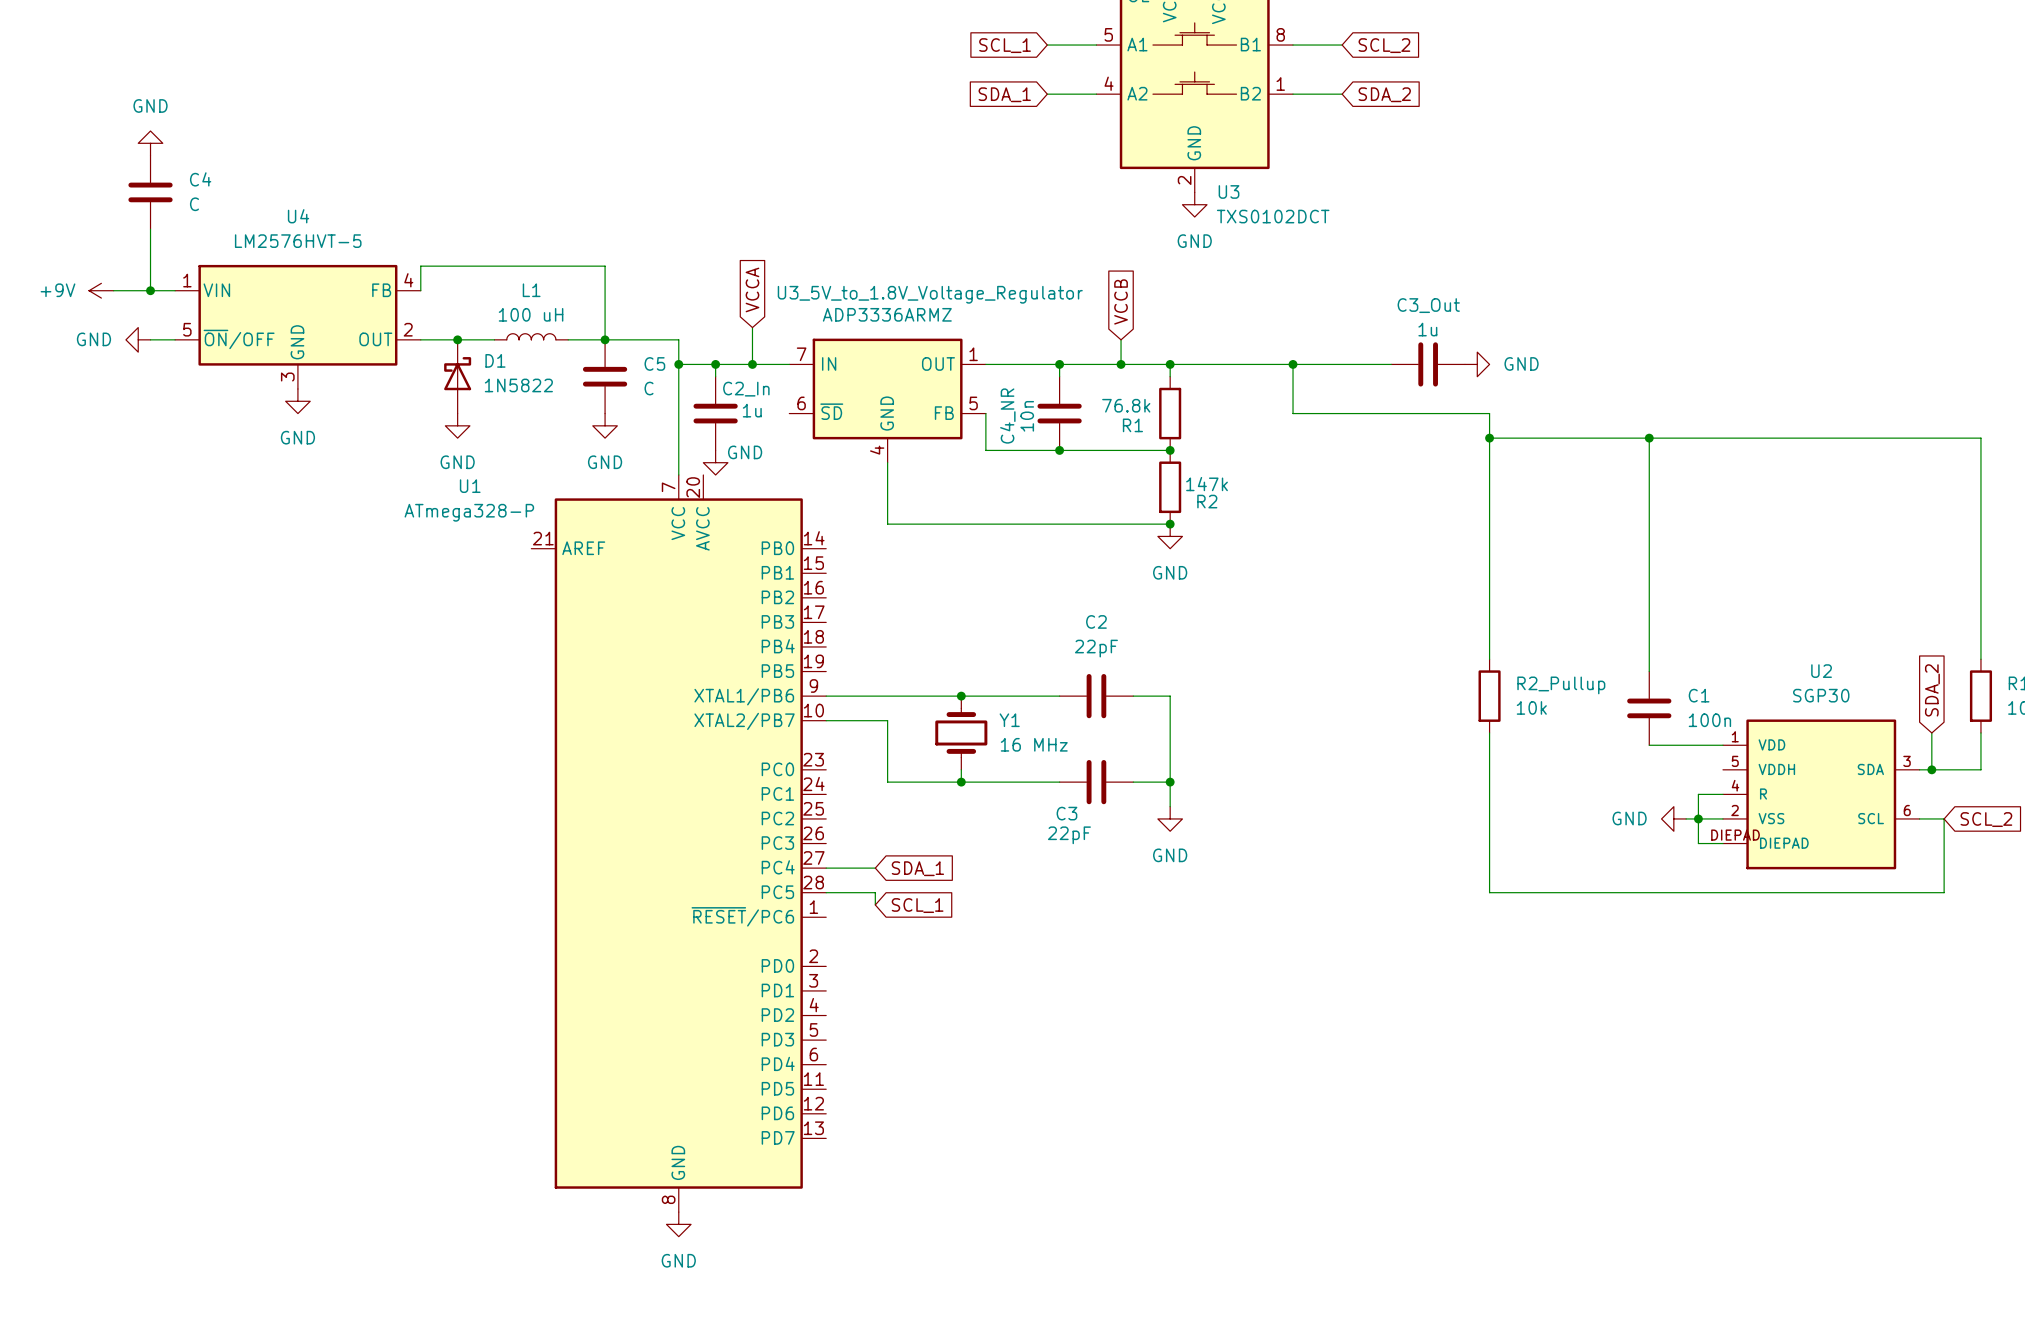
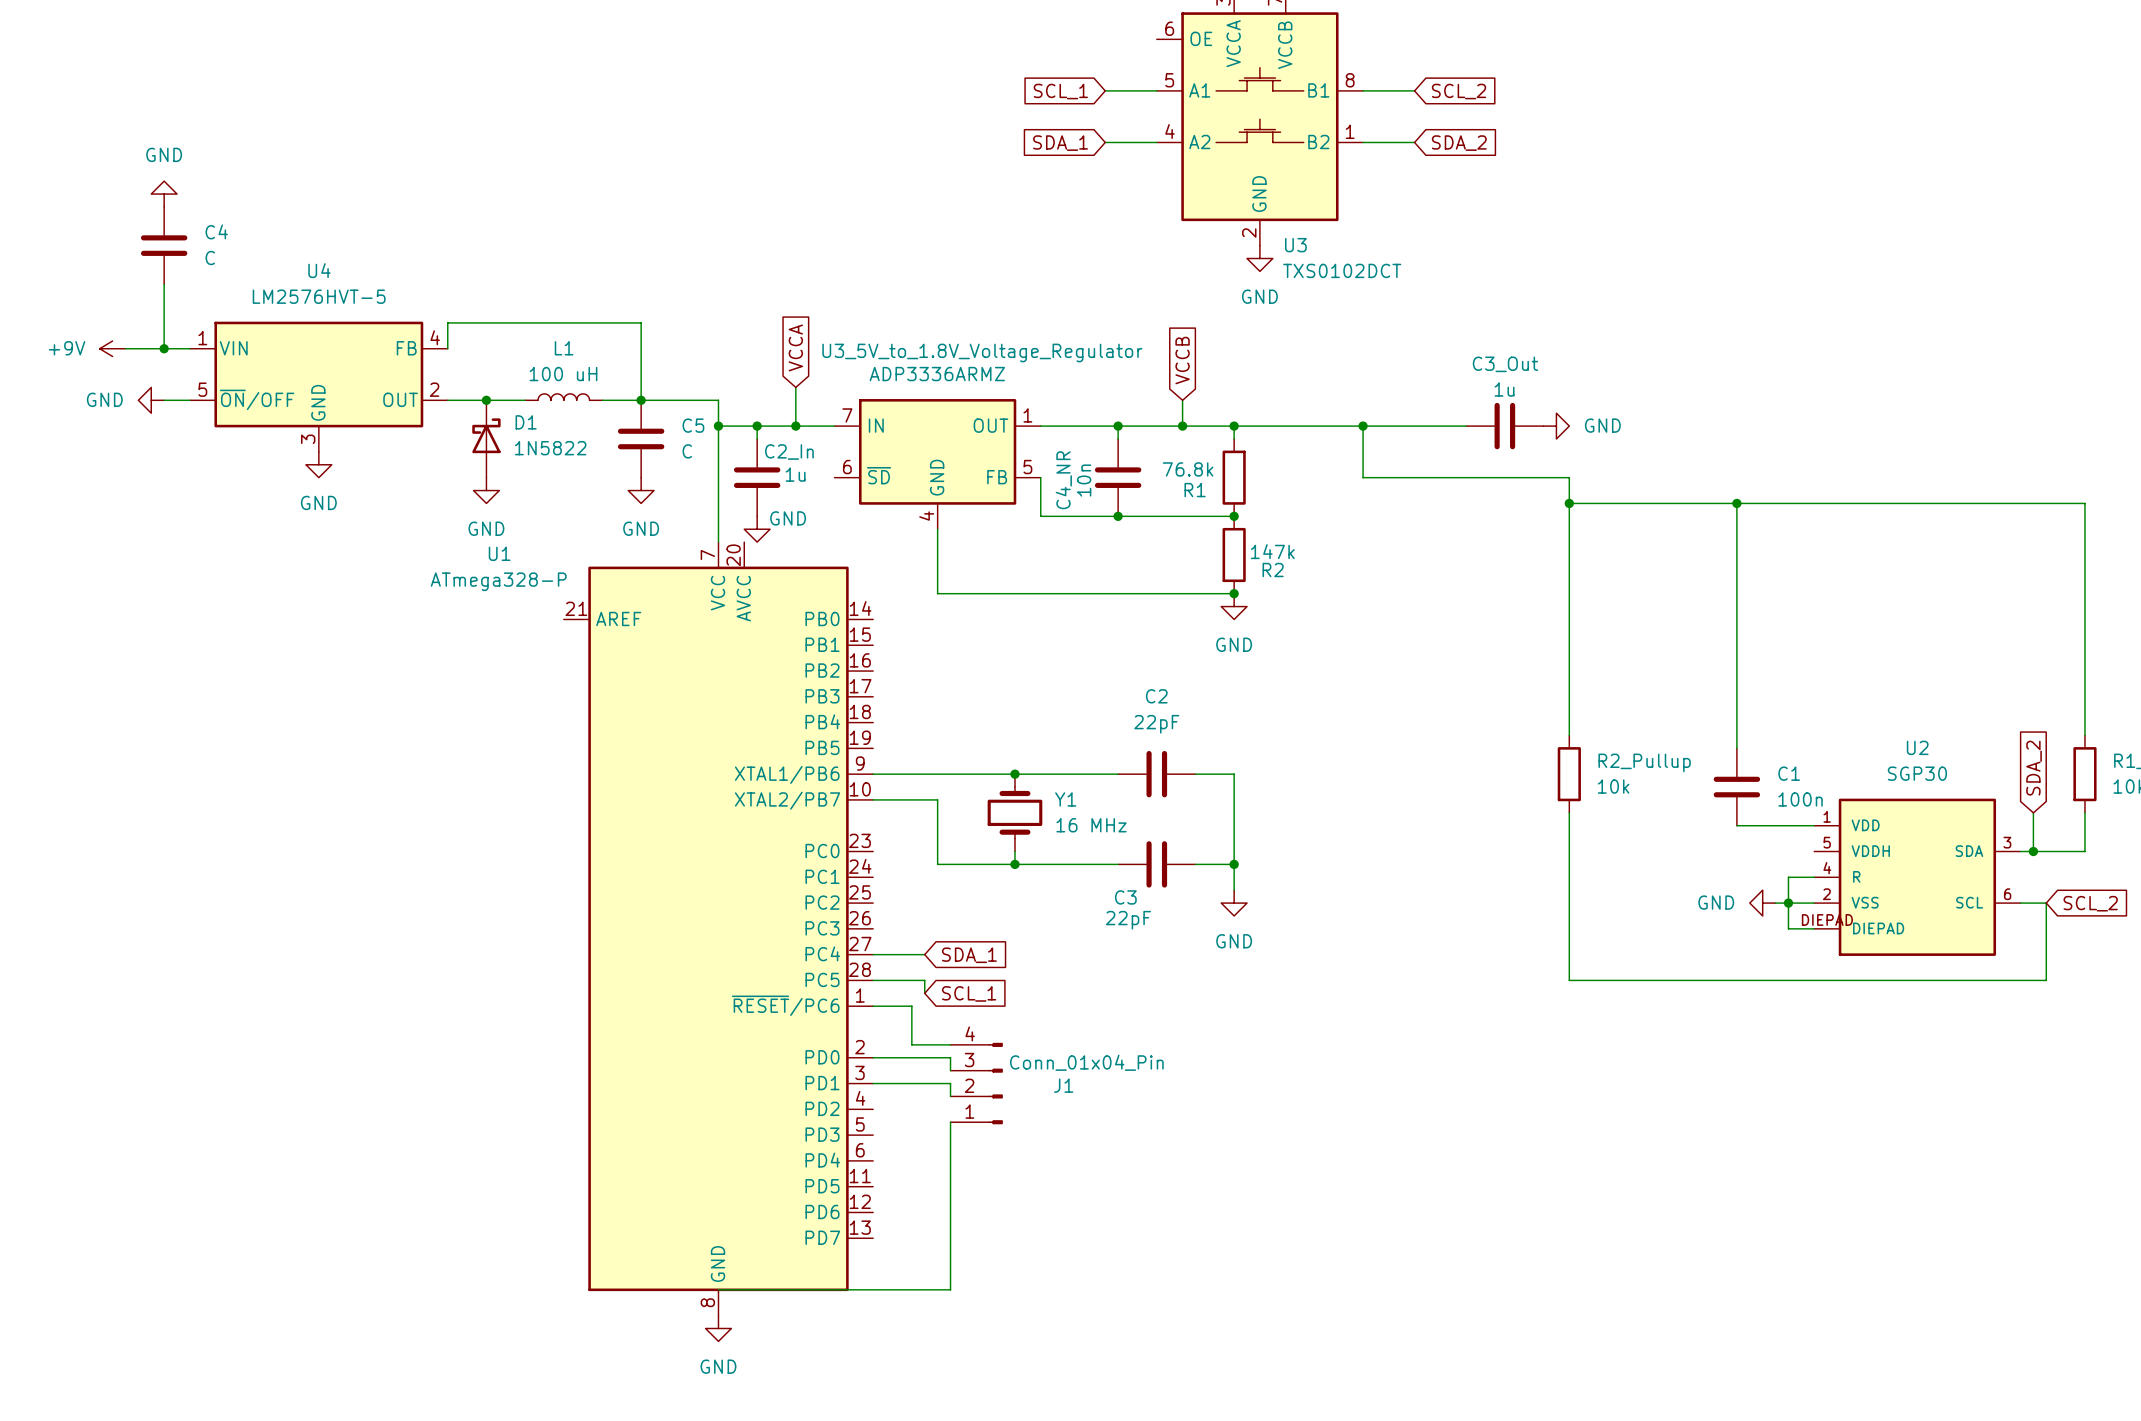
wire: none -> (873, 1006) (911, 1006) (911, 1044) (950, 1044)
wire: none -> (873, 1057) (950, 1057) (950, 1070)
wire: none -> (873, 1083) (950, 1083) (950, 1096)
J1: none -> Conn_01x04_Pin (976, 1083)
wire: none -> (950, 1122) (950, 1289) (718, 1289)

